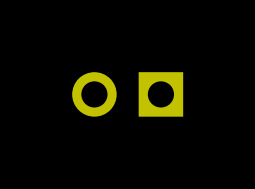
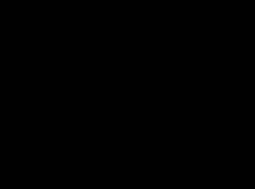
part: (127, 94) -> none

